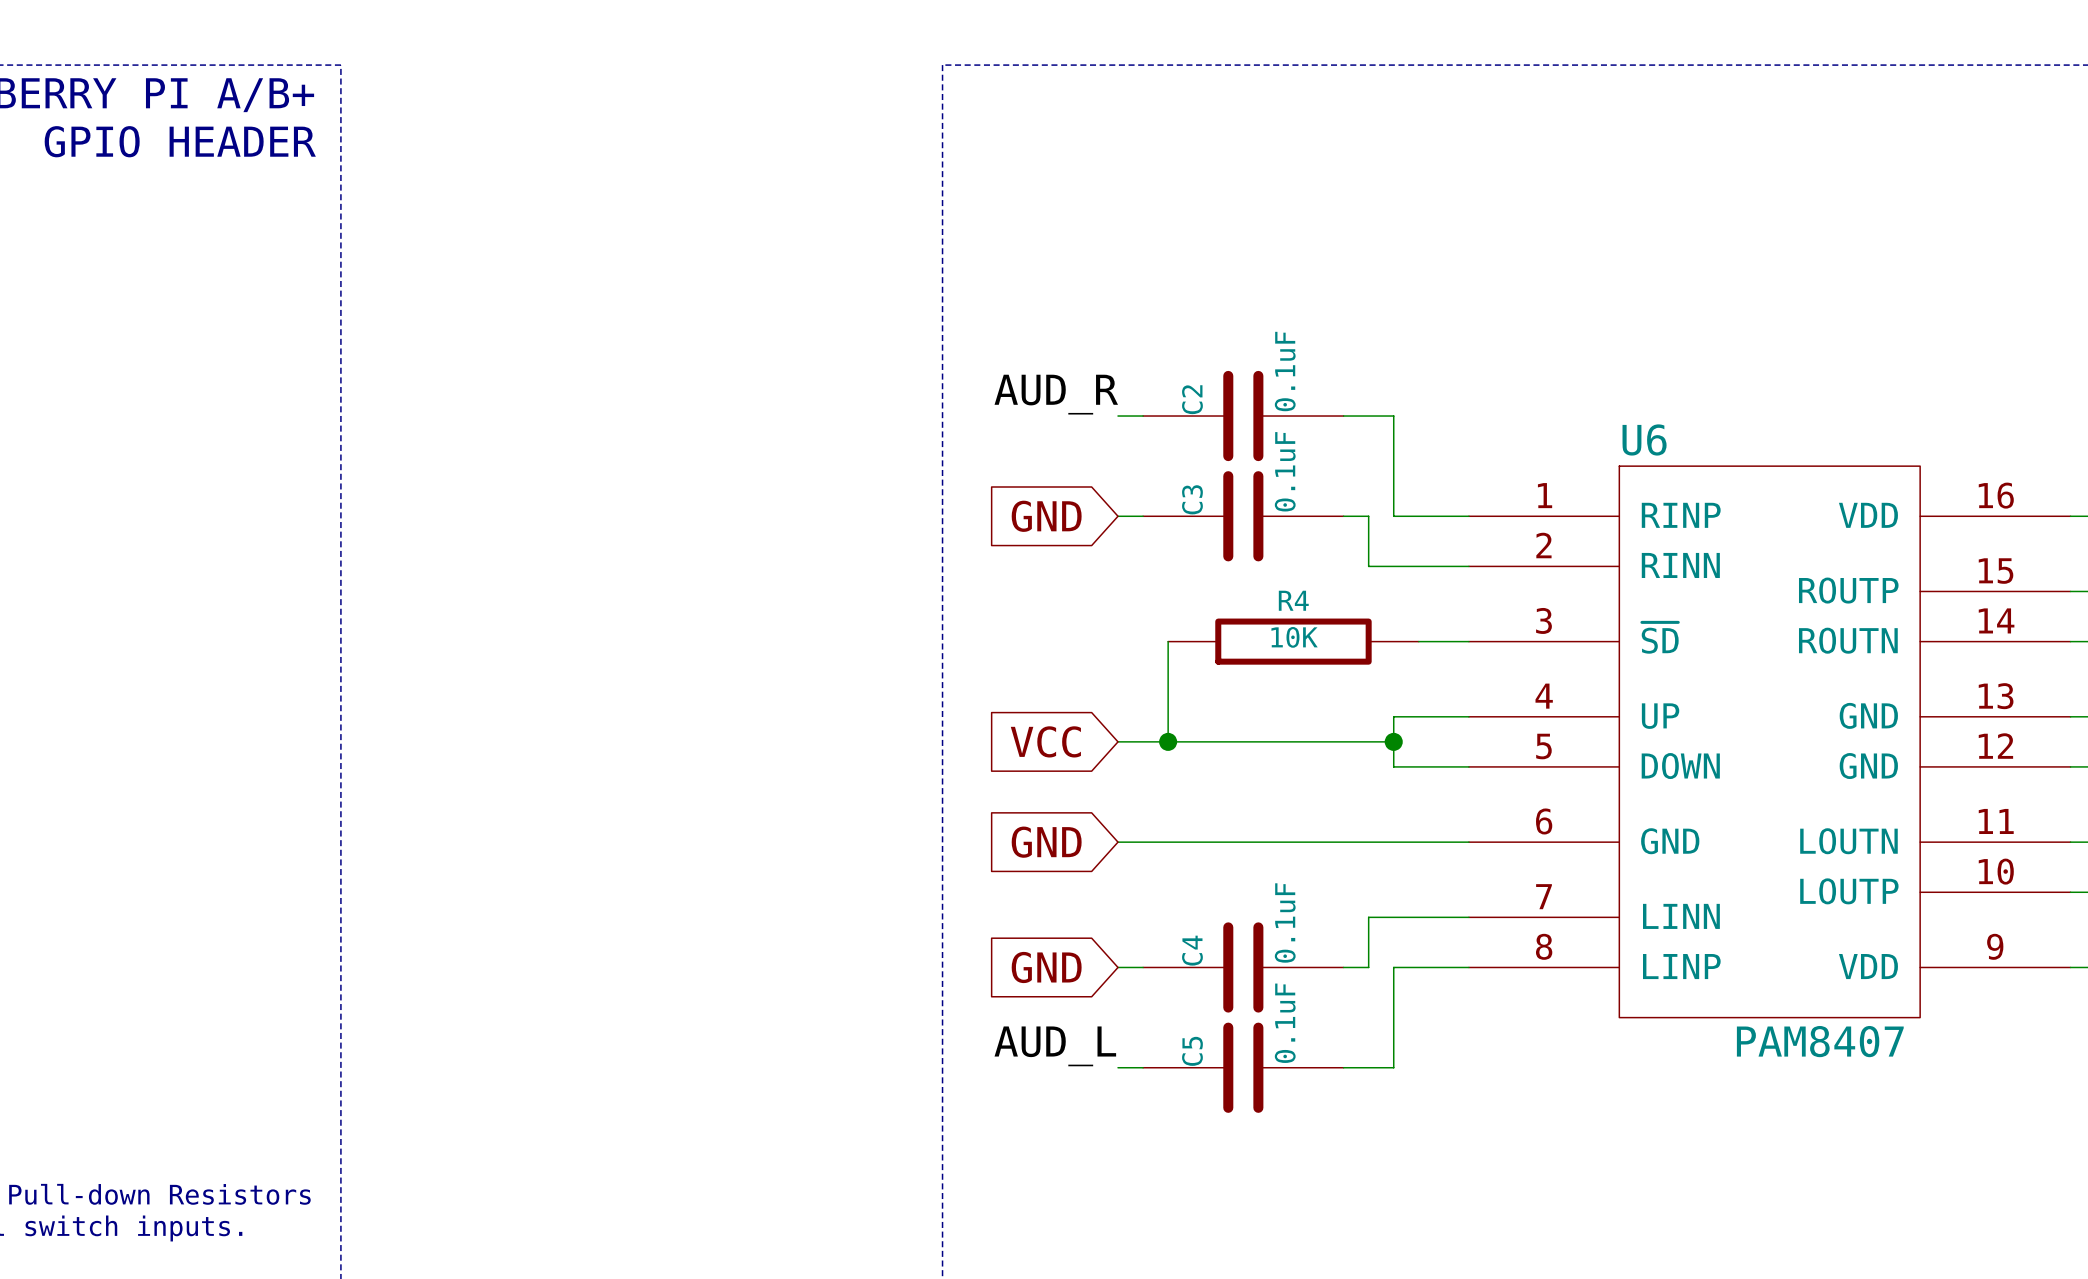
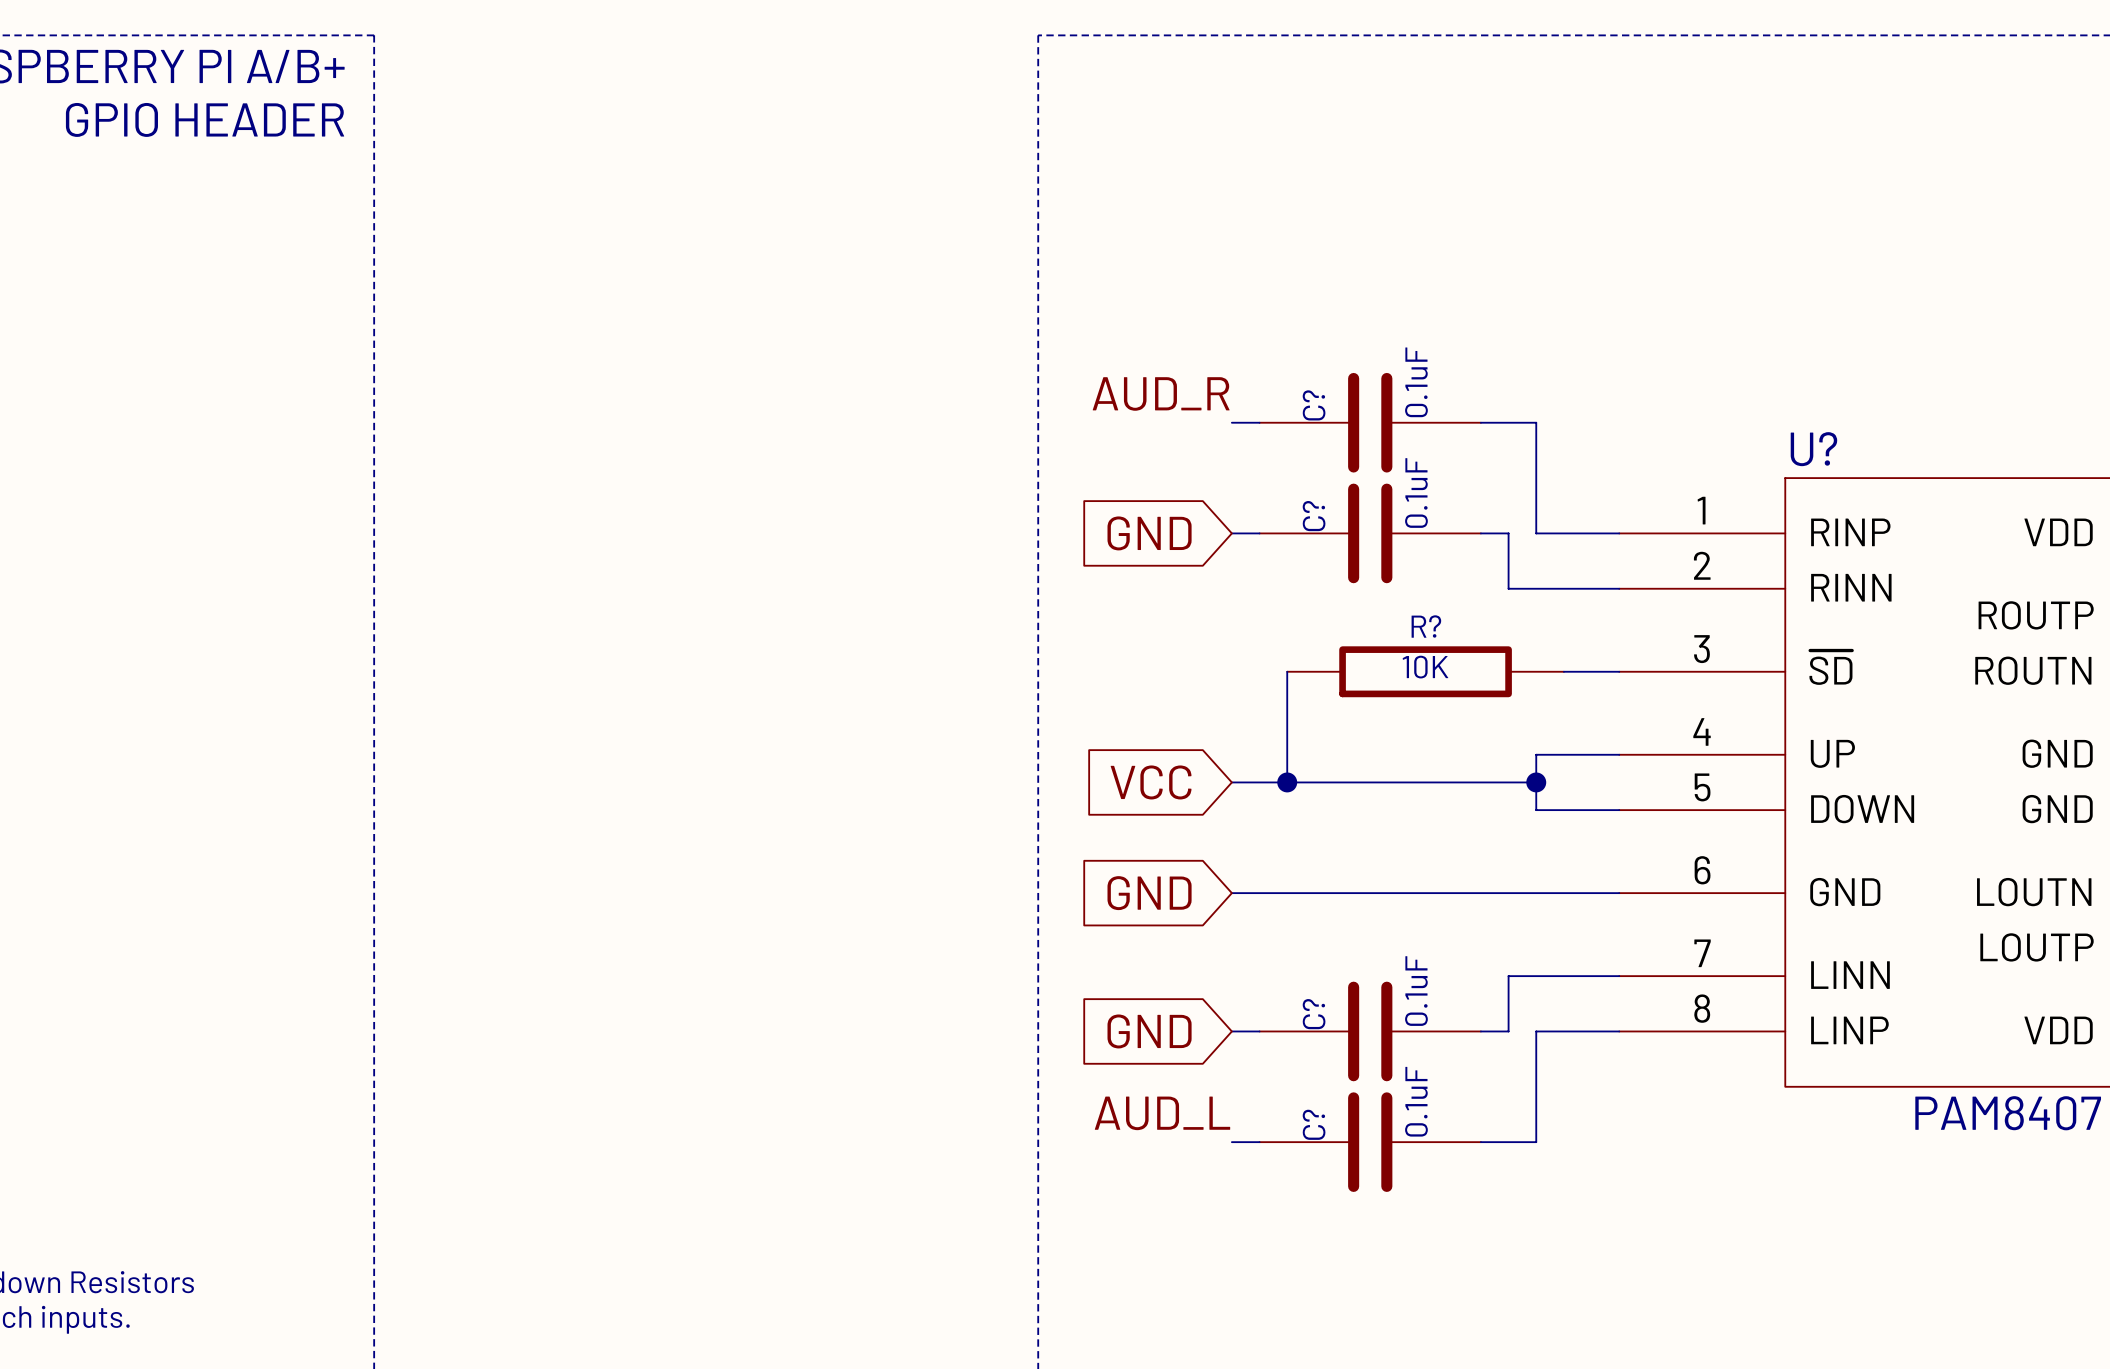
C2 name: C2 (1192, 399) -> C? (1314, 405)
U6 name: U6 (1644, 439) -> U? (1813, 449)
C3 name: C3 (1192, 499) -> C? (1314, 516)
R4 name: R4 (1293, 600) -> R? (1426, 626)
C4 name: C4 (1192, 950) -> C? (1314, 1014)
C5 name: C5 (1192, 1051) -> C? (1314, 1124)

